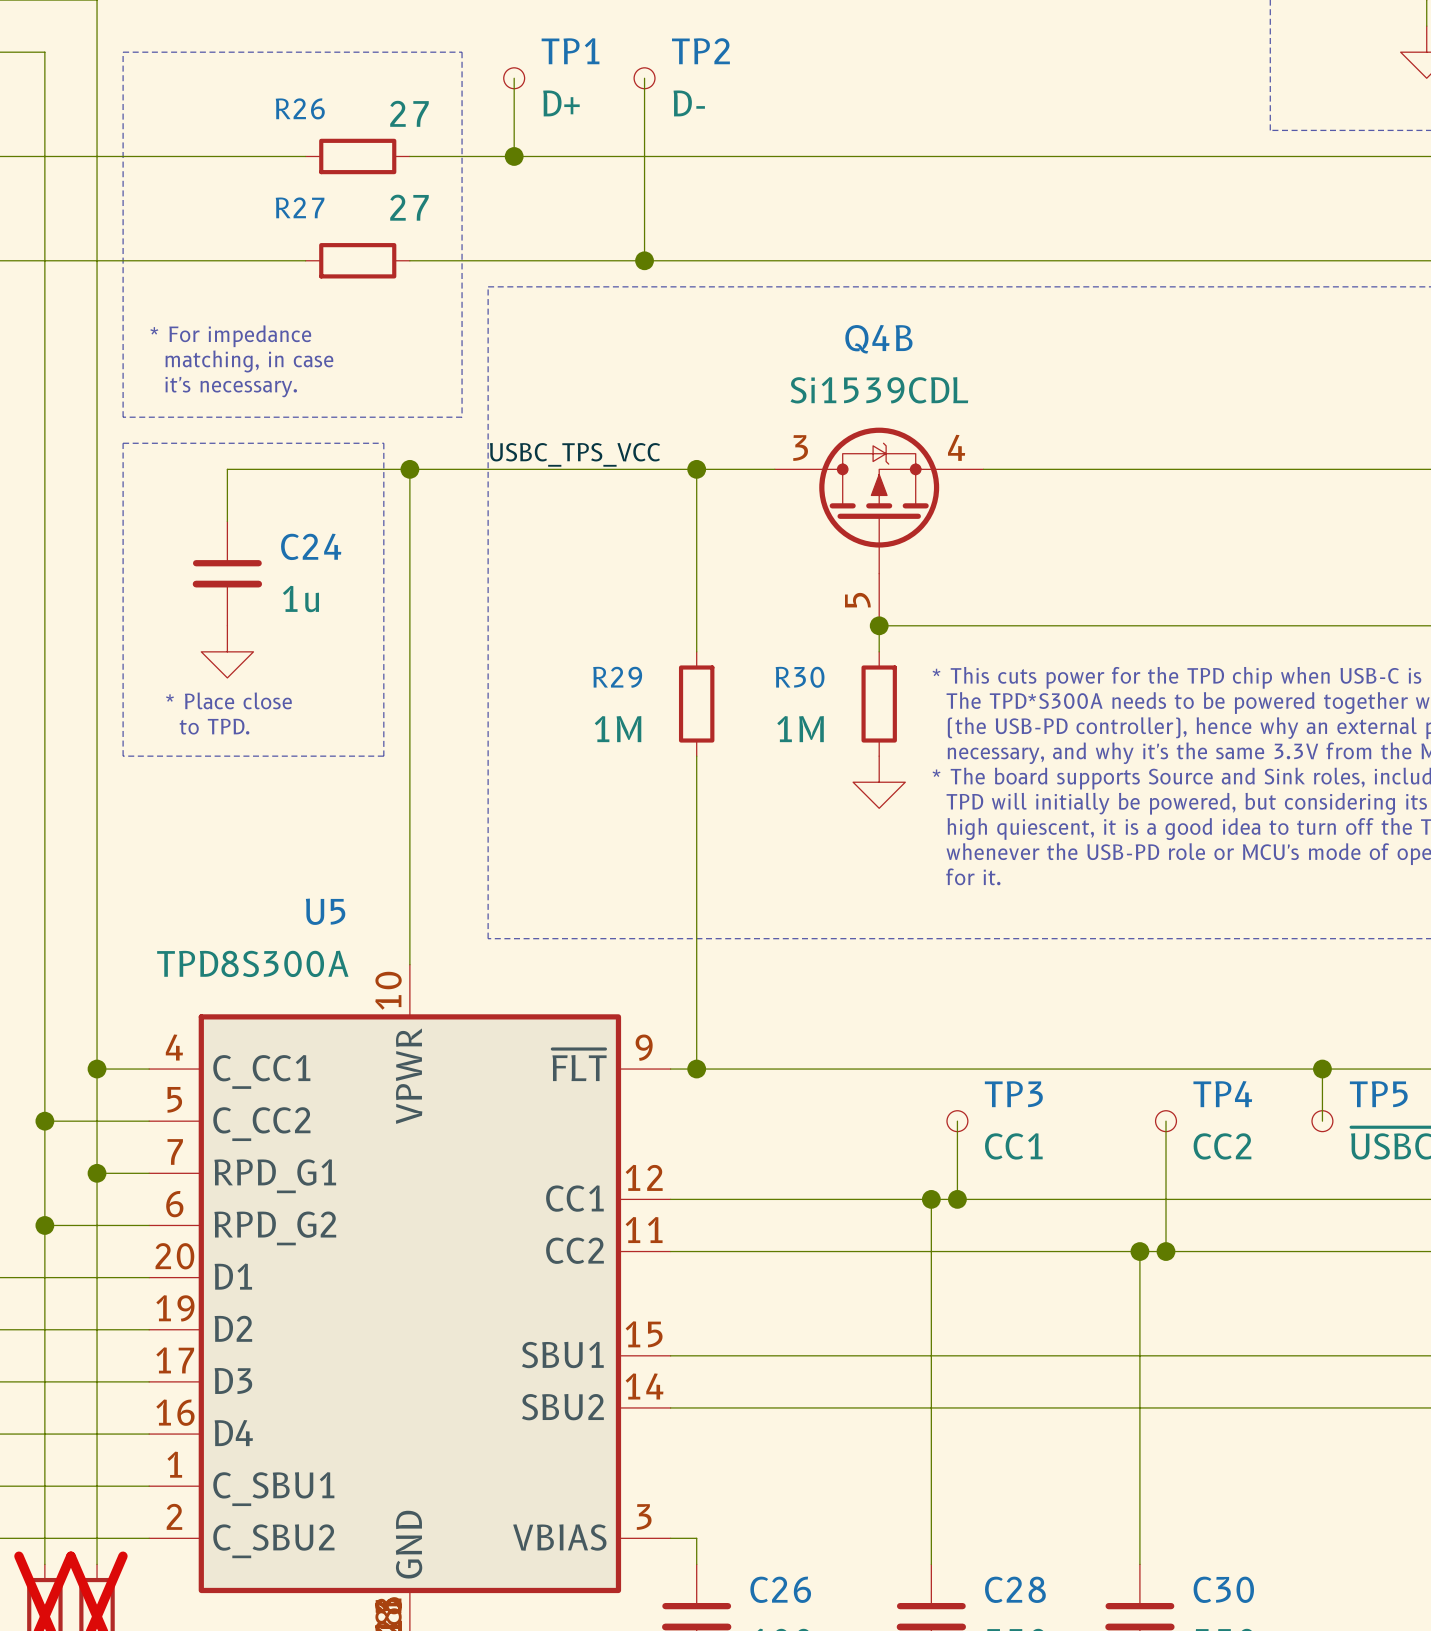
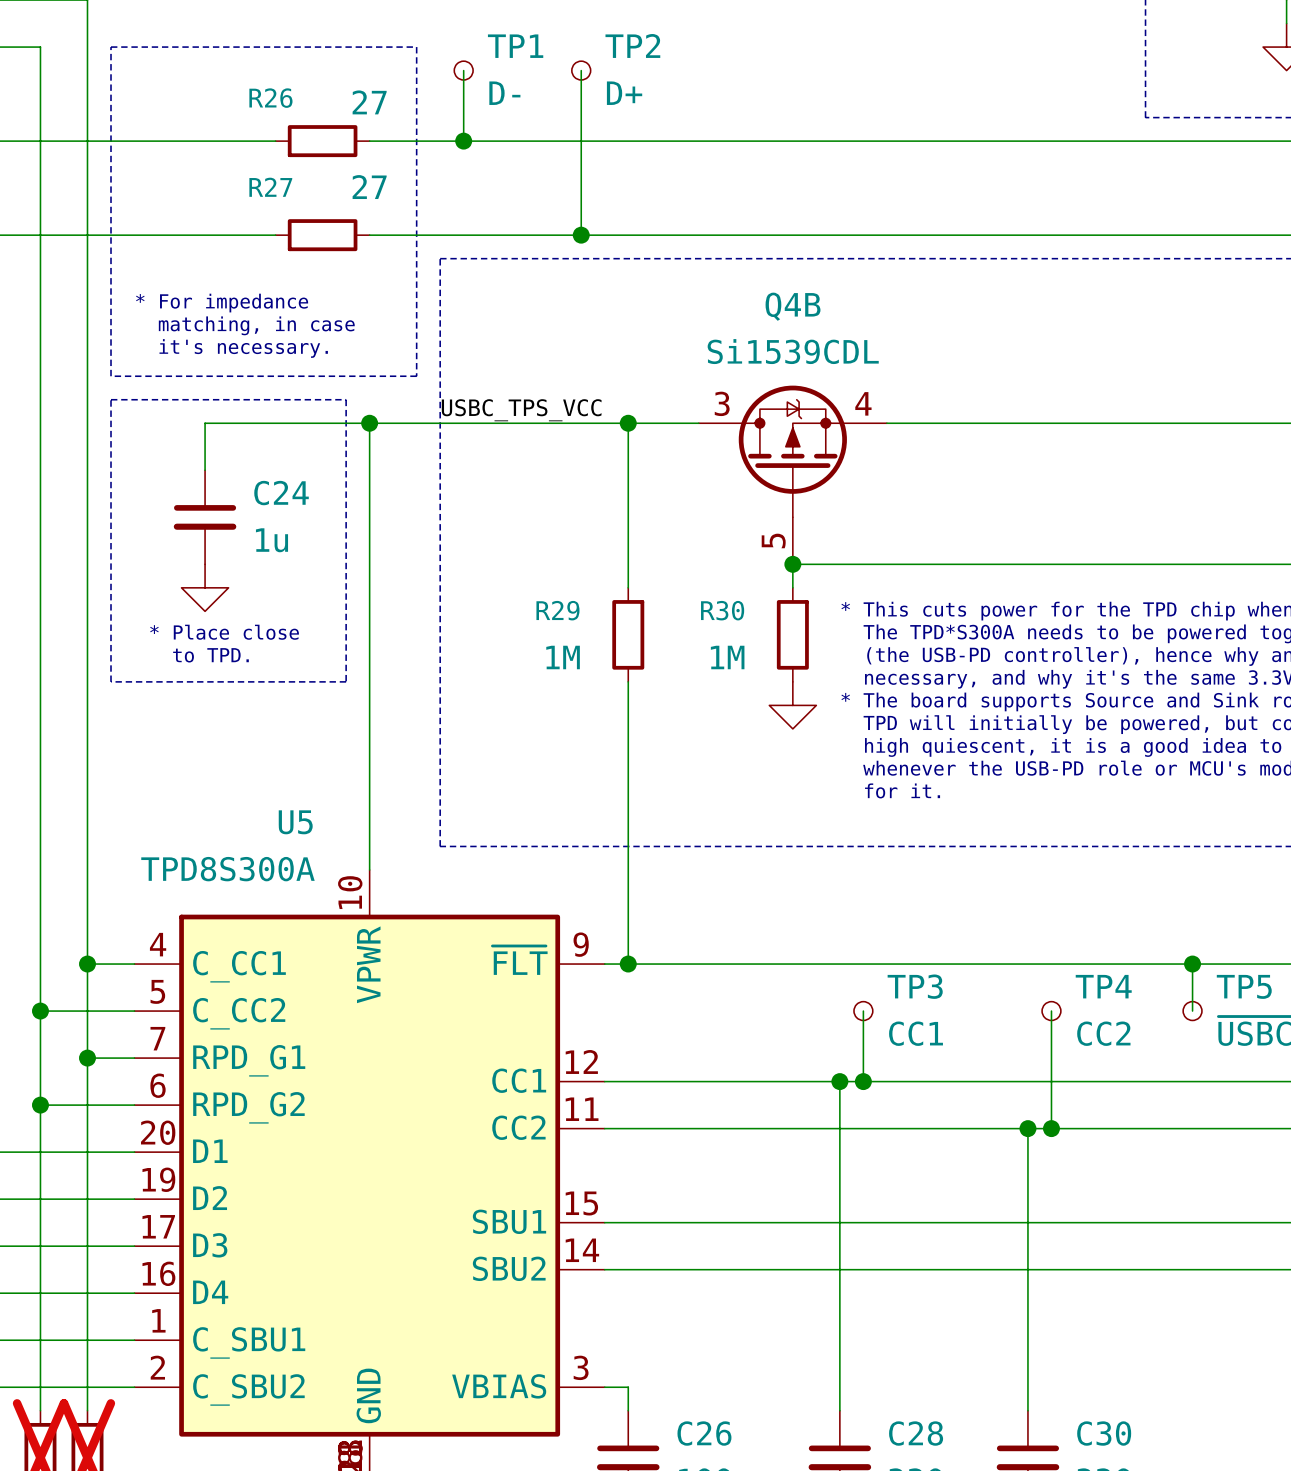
TP1 value: D+ (561, 103) -> D- (504, 93)
TP2 value: D- (689, 103) -> D+ (624, 93)

